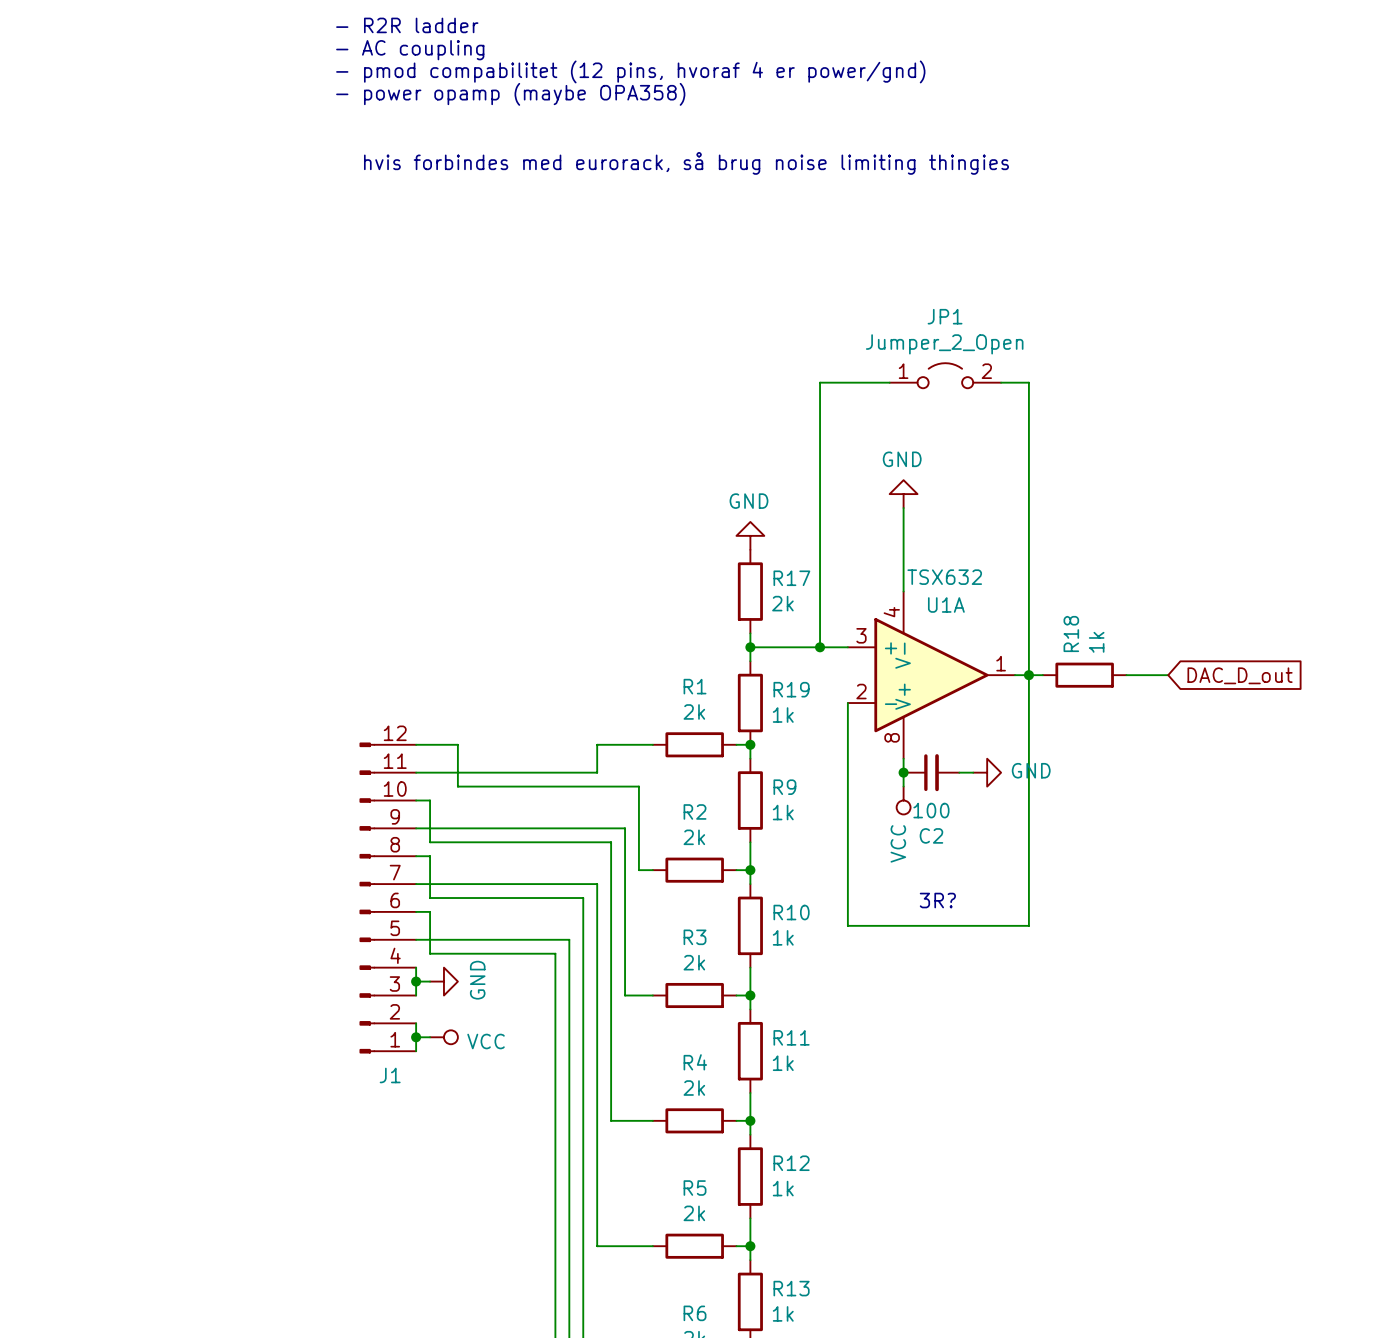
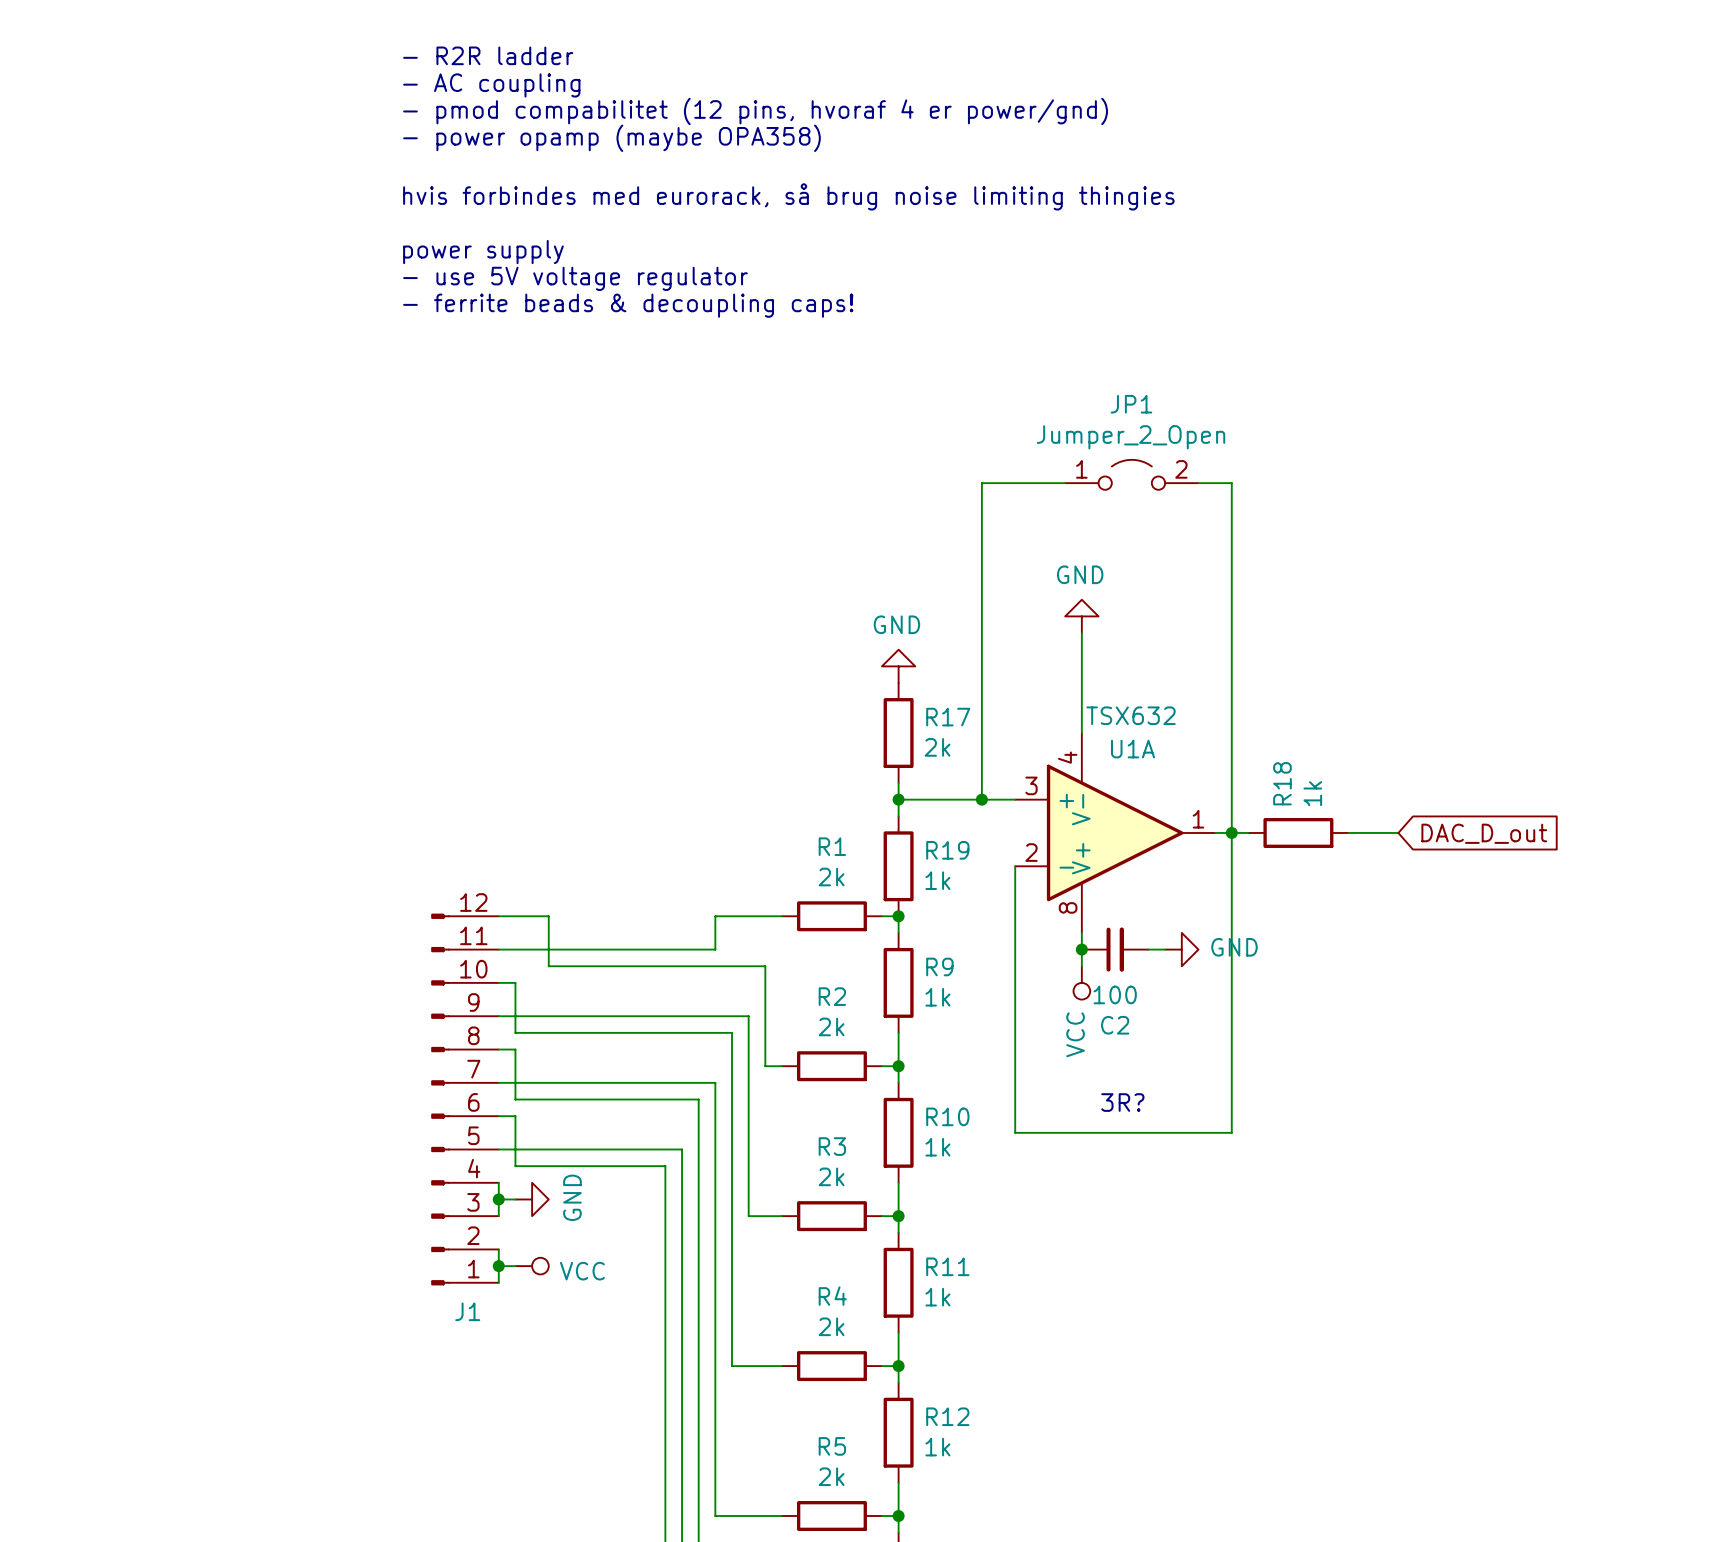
text position: hvis forbindes med eurorack, så brug noise limiting thingies (686, 163) -> hvis forbindes med eurorack, så brug noise limiting thingies (788, 196)
text: none -> power supply (483, 252)
text: none -> - use 5V voltage regulator (575, 278)
text: none -> - ferrite beads & decoupling caps! (628, 305)

